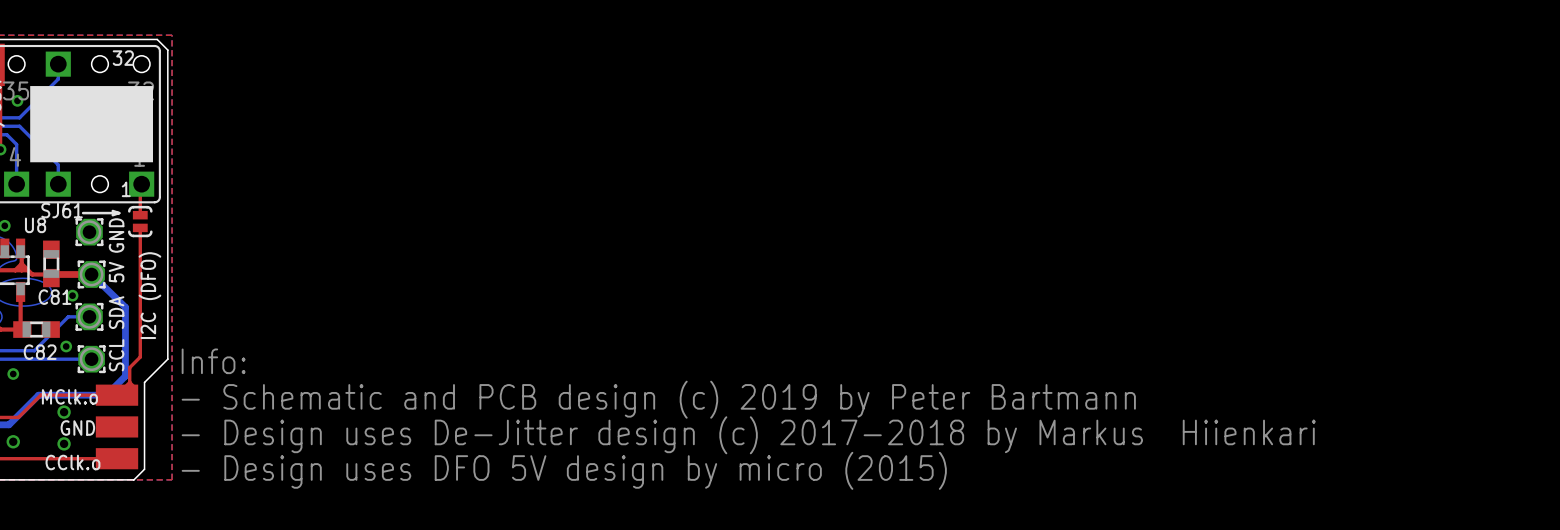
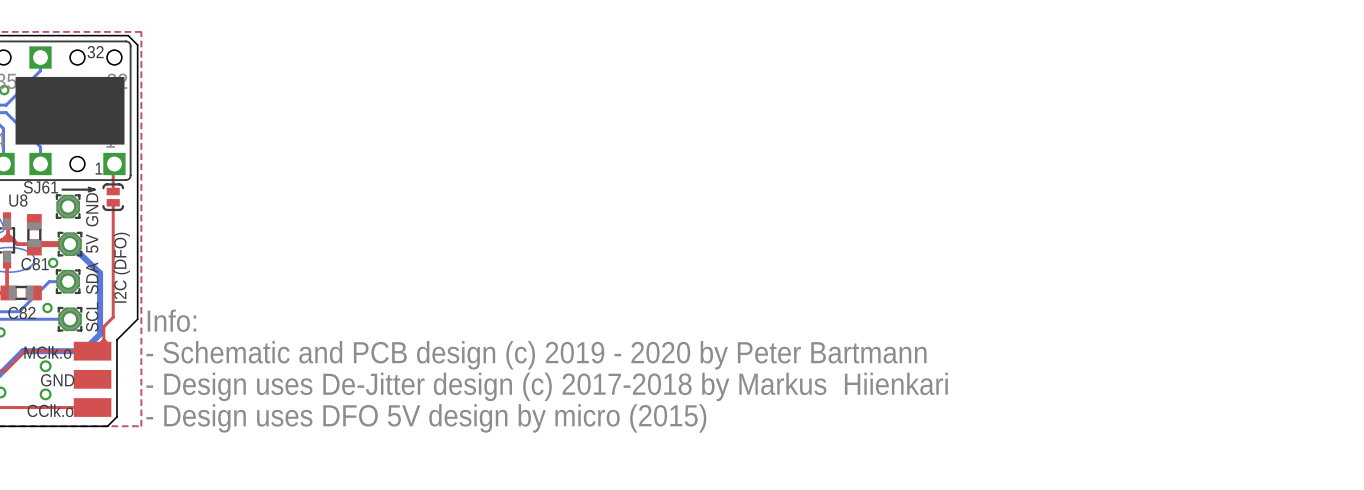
text: - Schematic and PCB design (c) 2019 by Peter Bartmann (658, 399) -> - Schematic and PCB design (c) 2019 - 2020 by Peter Bartmann (536, 355)

